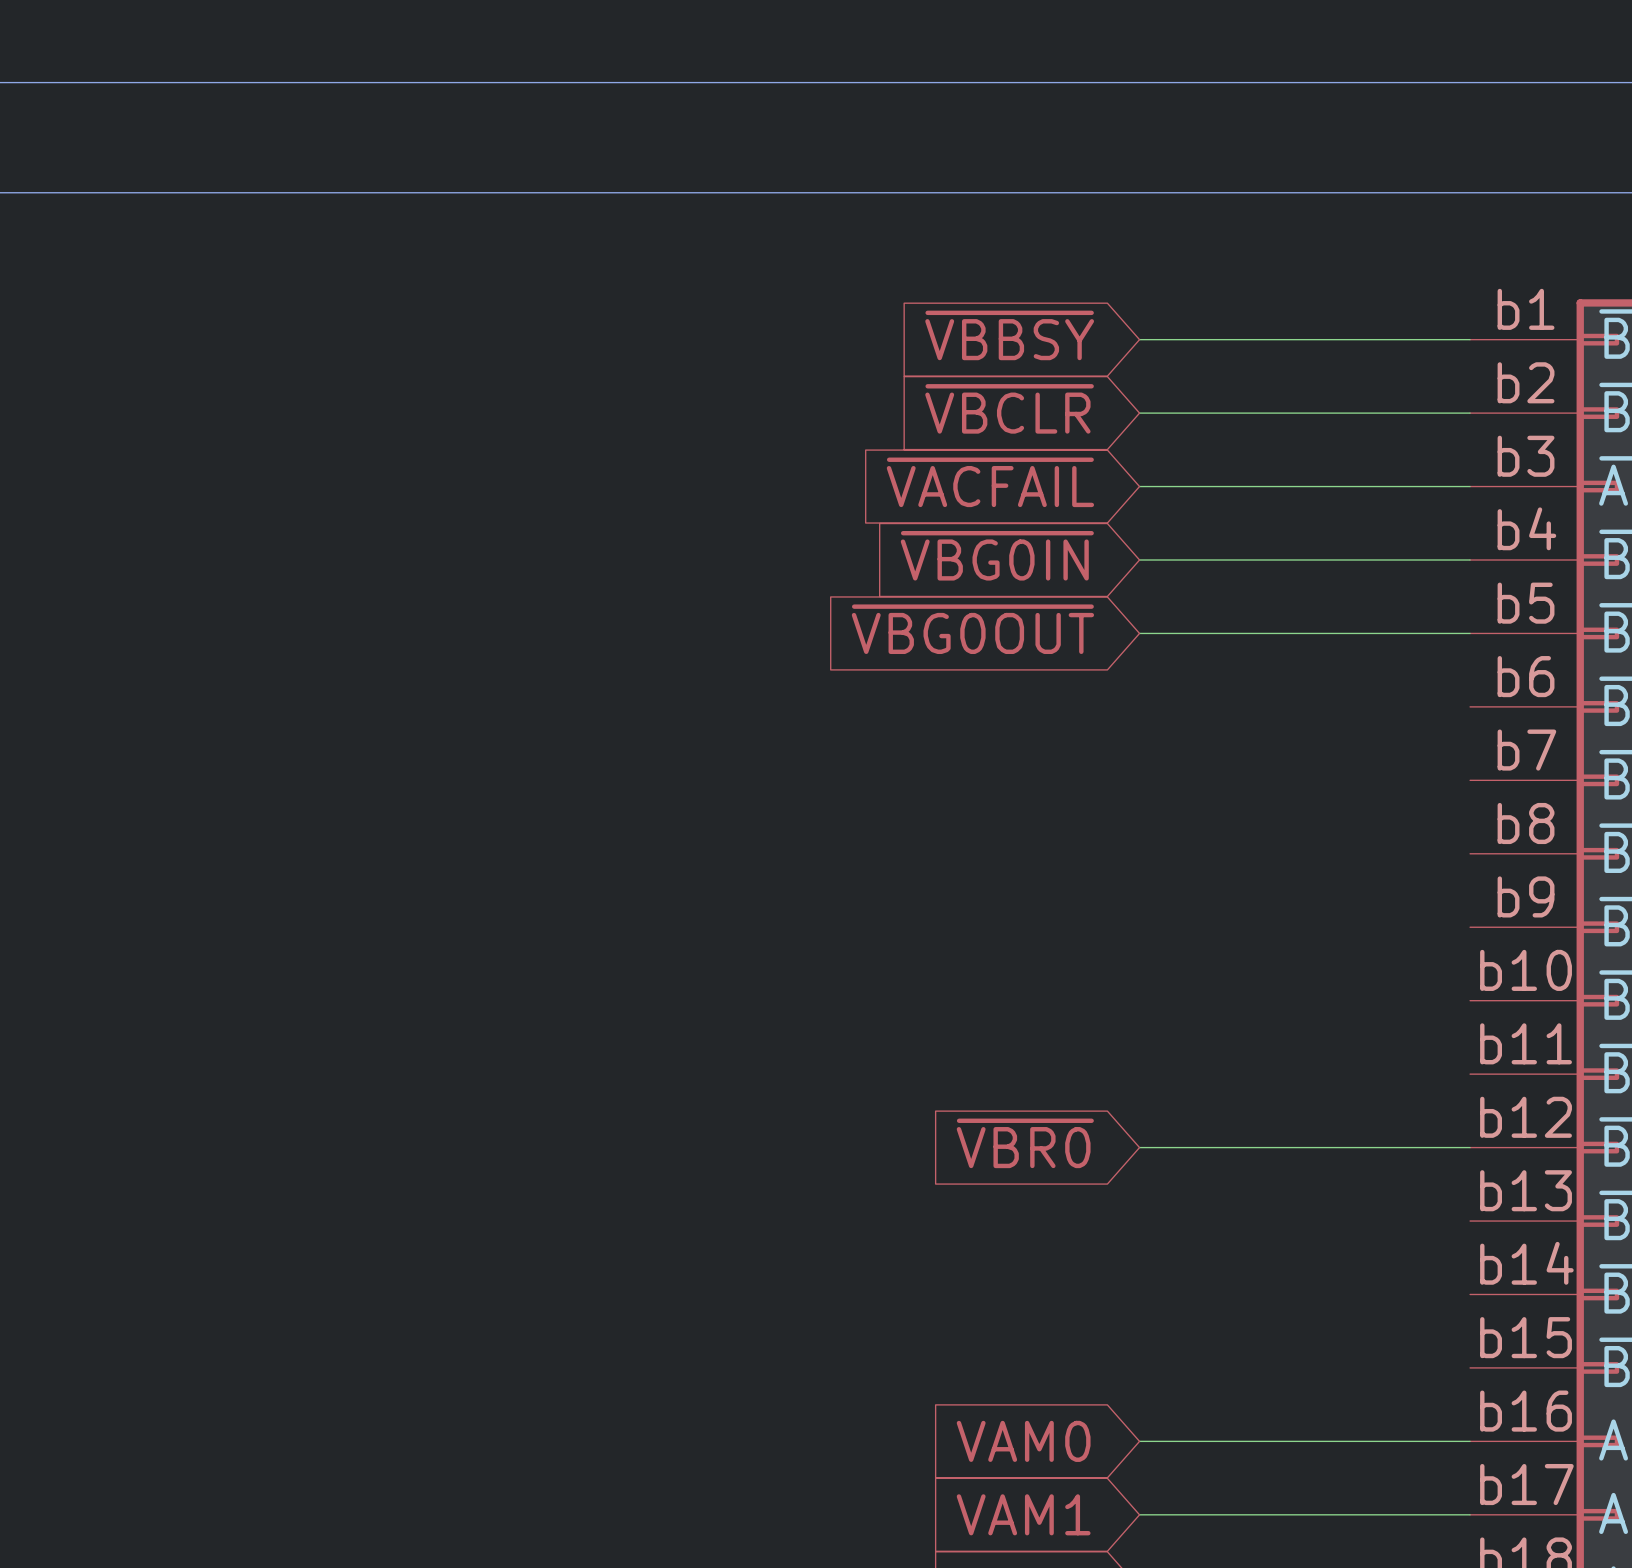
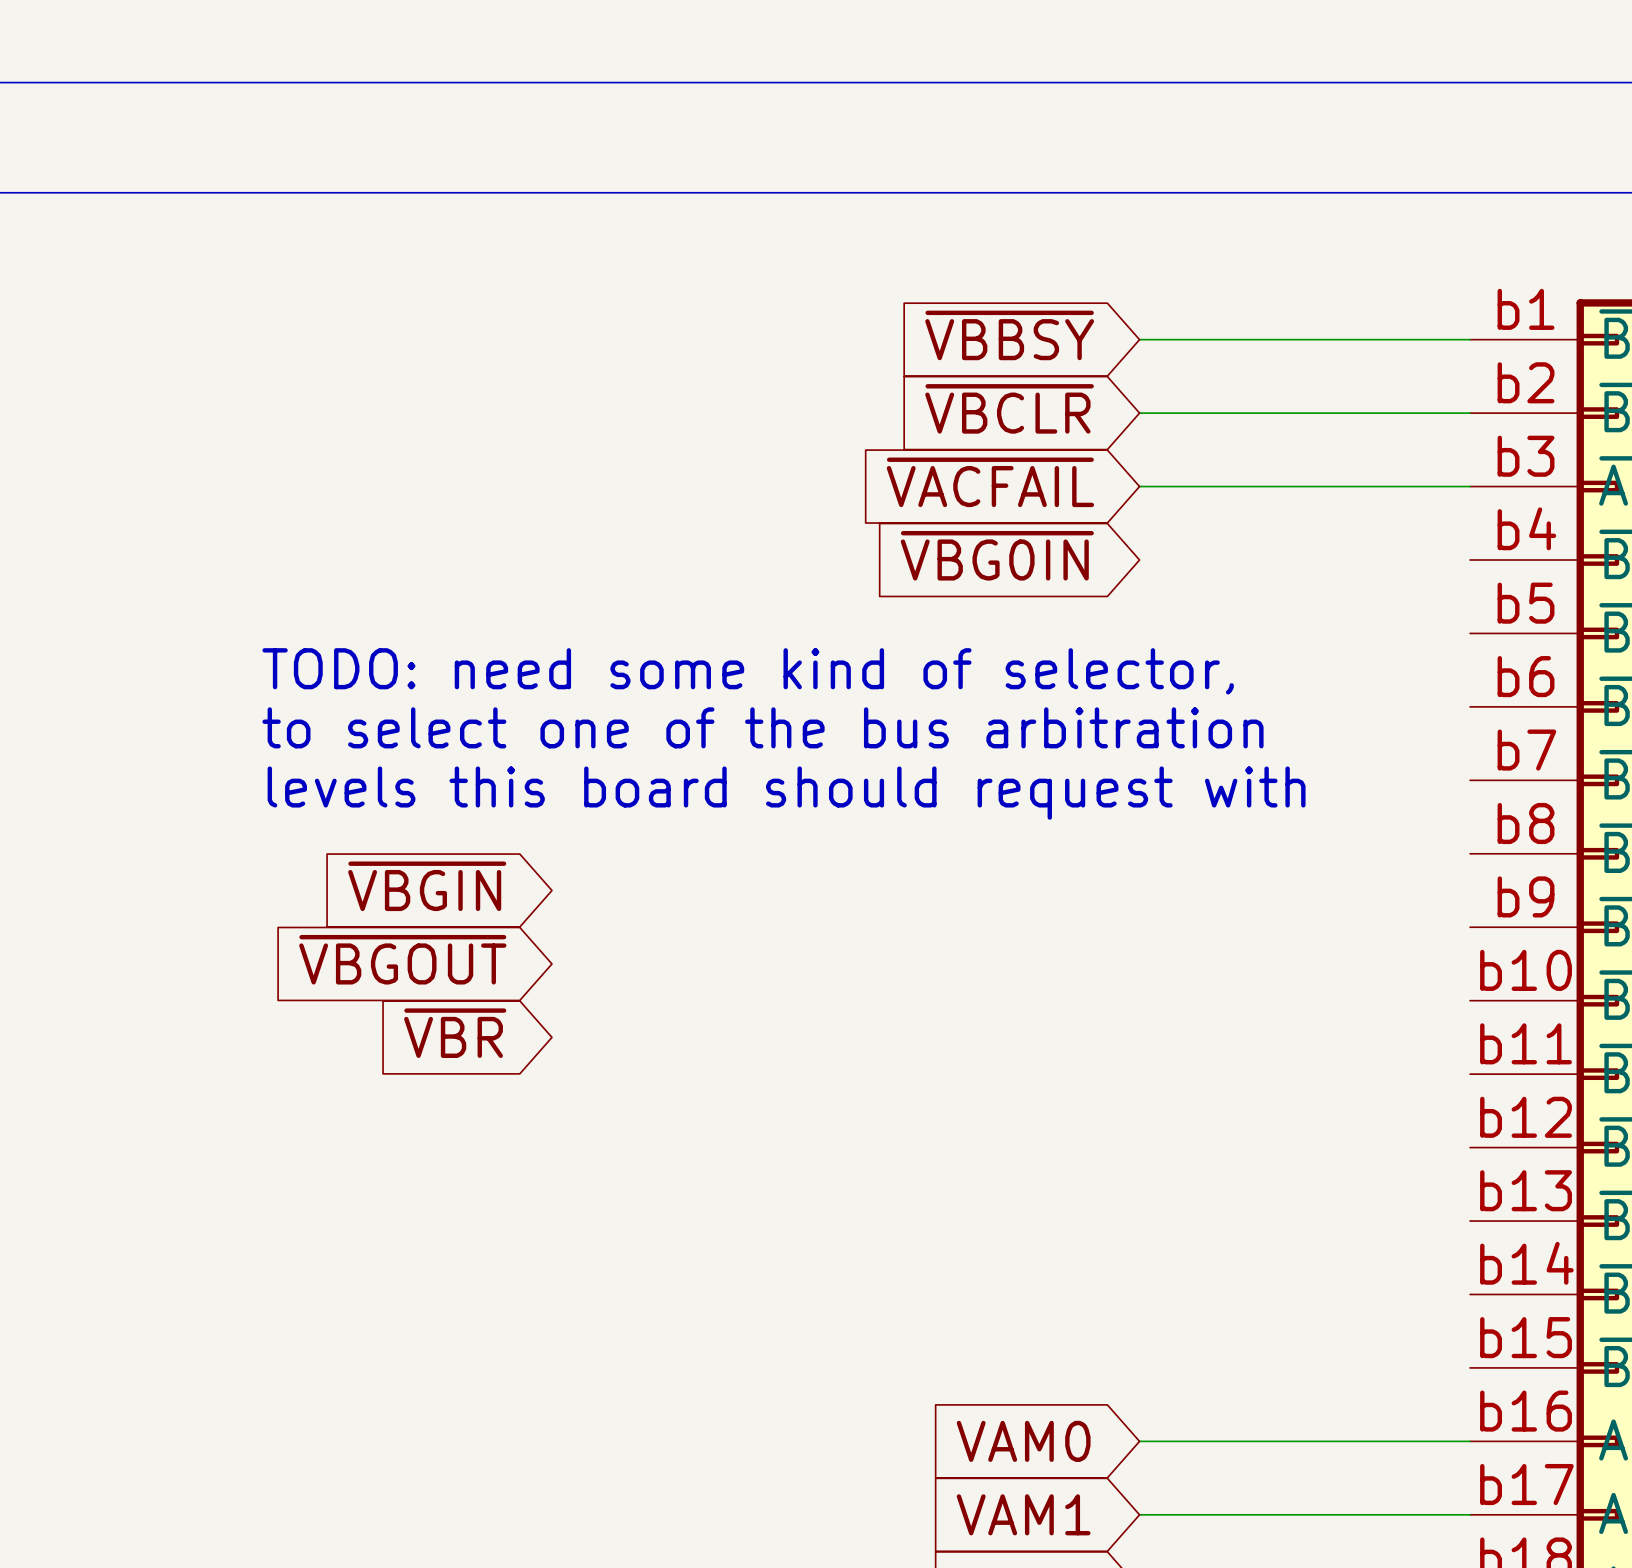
wire: (1139, 560) (1470, 560) -> none
global label: ~{VBG0OUT} (972, 629) -> none
wire: (1139, 633) (1470, 633) -> none
text: none -> TODO: need some kind of selector, (748, 671)
text: none -> to select one of the bus arbitration (762, 727)
text: none -> levels this board should request with (786, 793)
global label: none -> ~{VBGIN} (427, 886)
global label: none -> ~{VBGOUT} (402, 959)
global label: none -> ~{VBR} (455, 1033)
global label: ~{VBR0} (1025, 1143) -> none
wire: (1139, 1147) (1470, 1147) -> none

